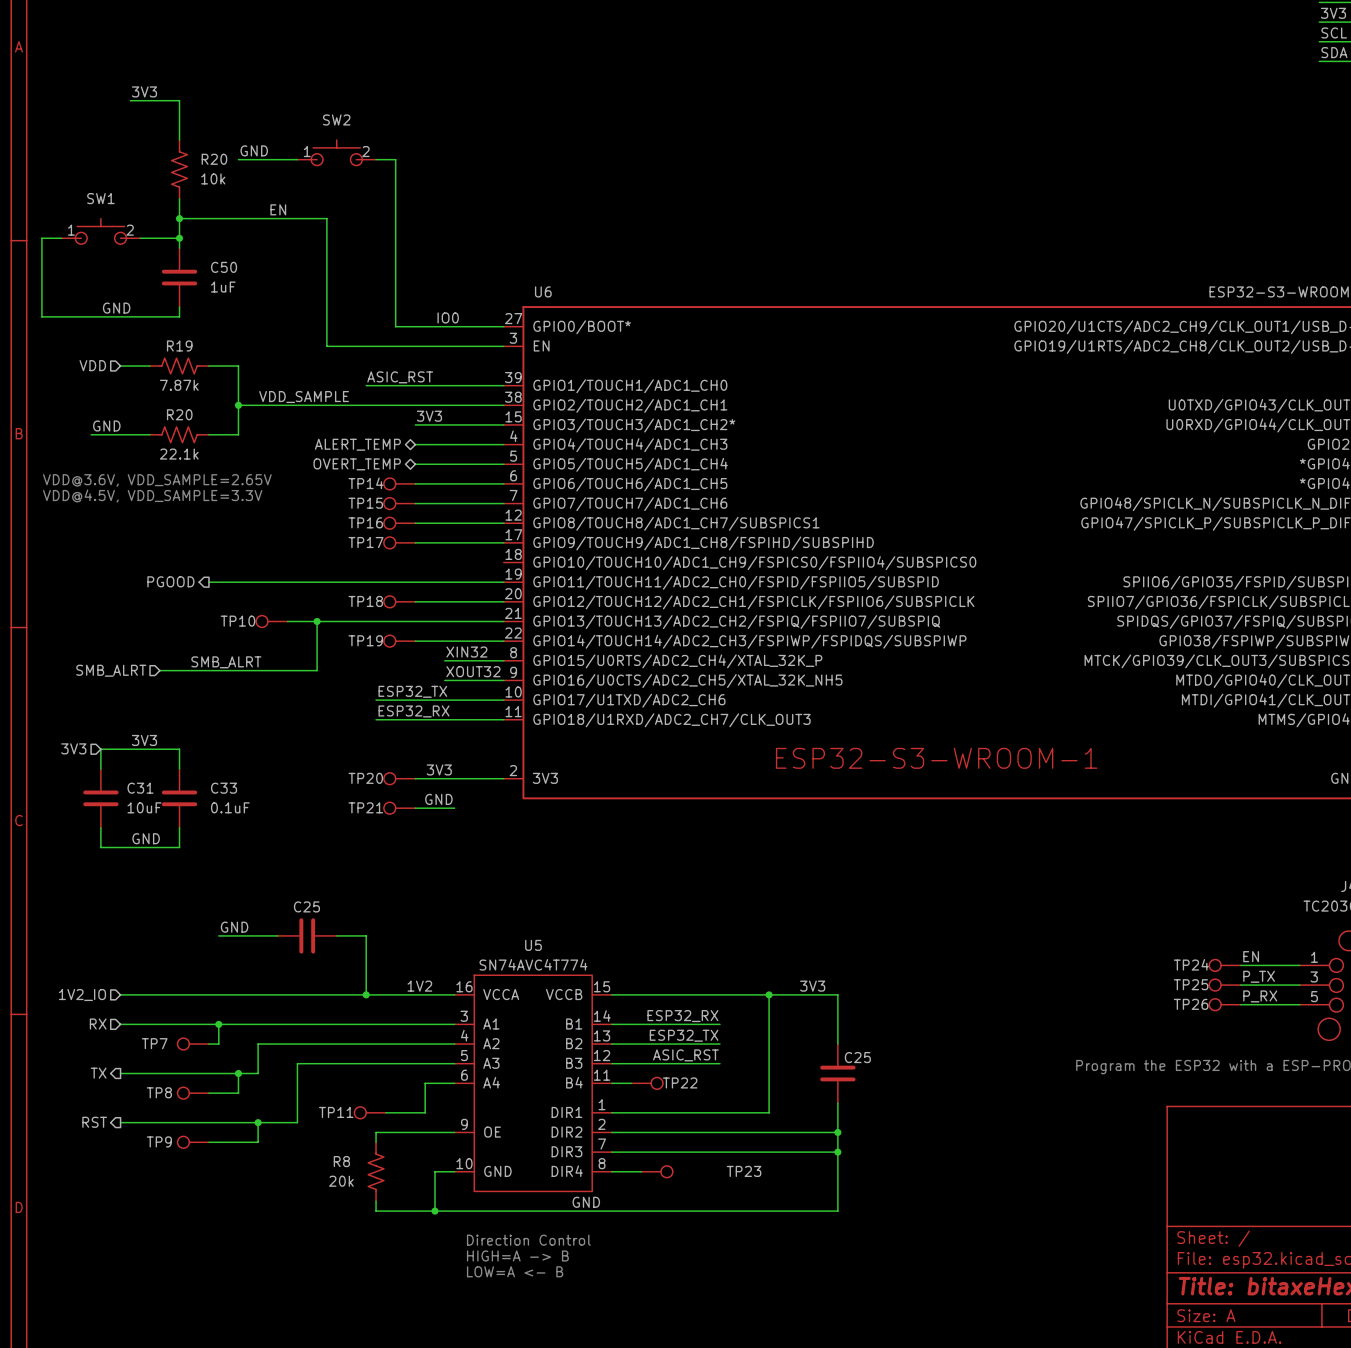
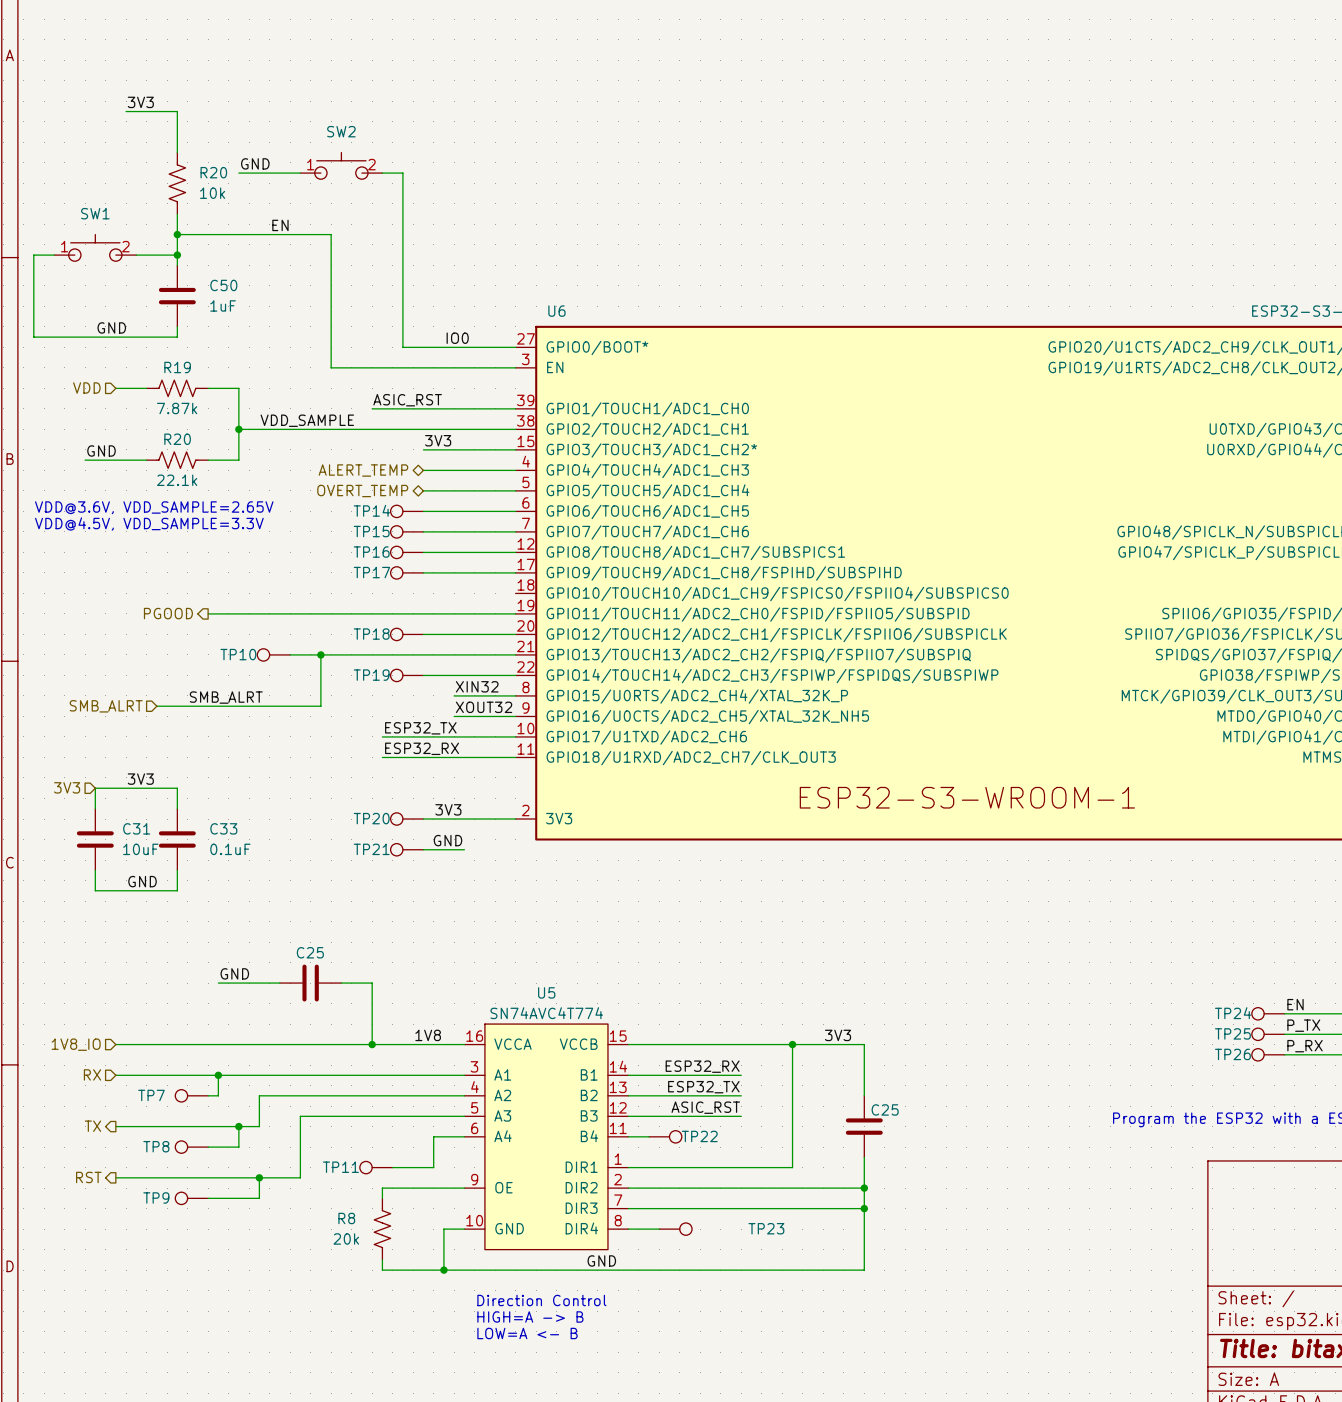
label: 1V2 (419, 986) -> 1V8 (428, 1035)
hierarchical label: 1V2_IO (82, 995) -> 1V8_IO (76, 1044)

